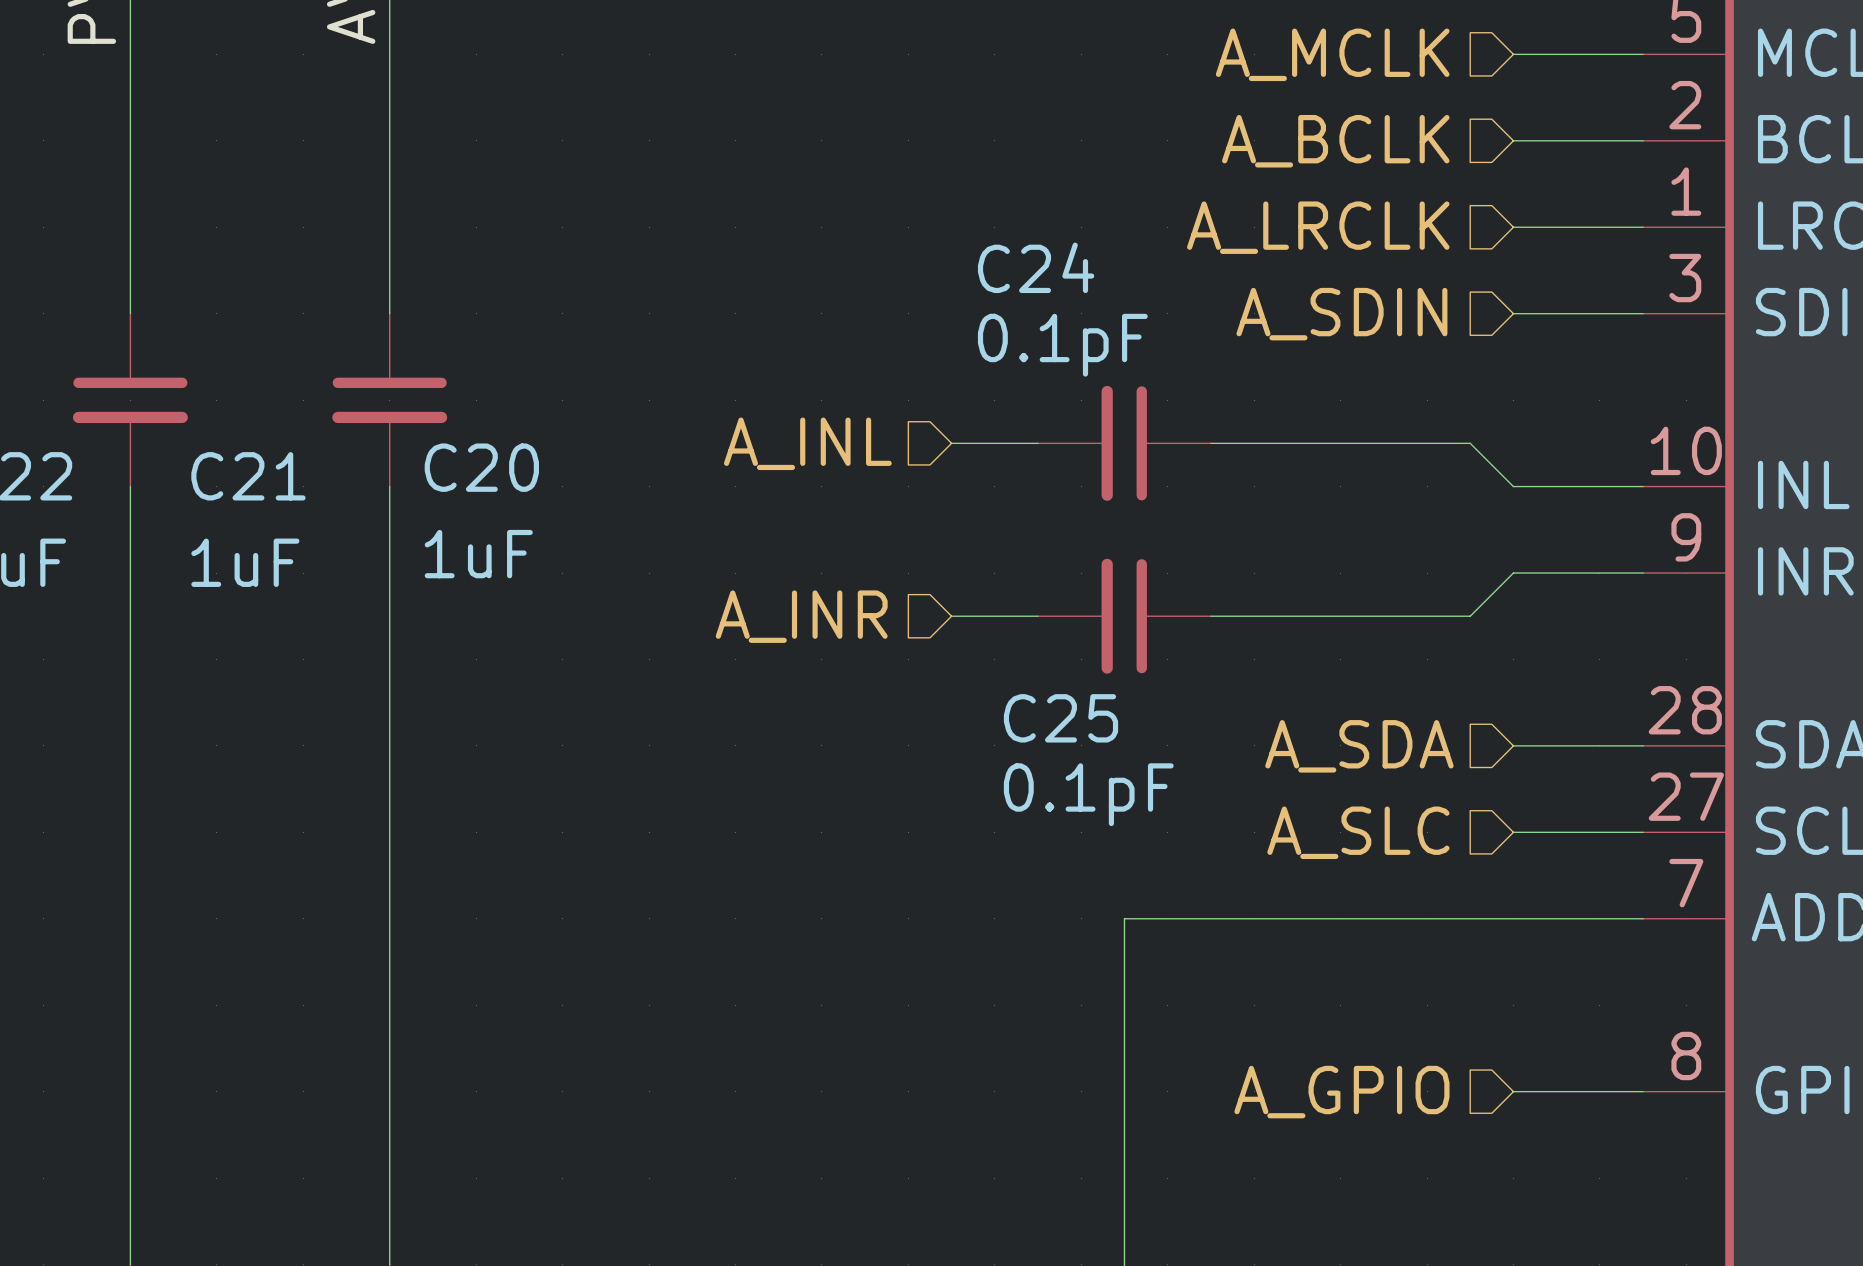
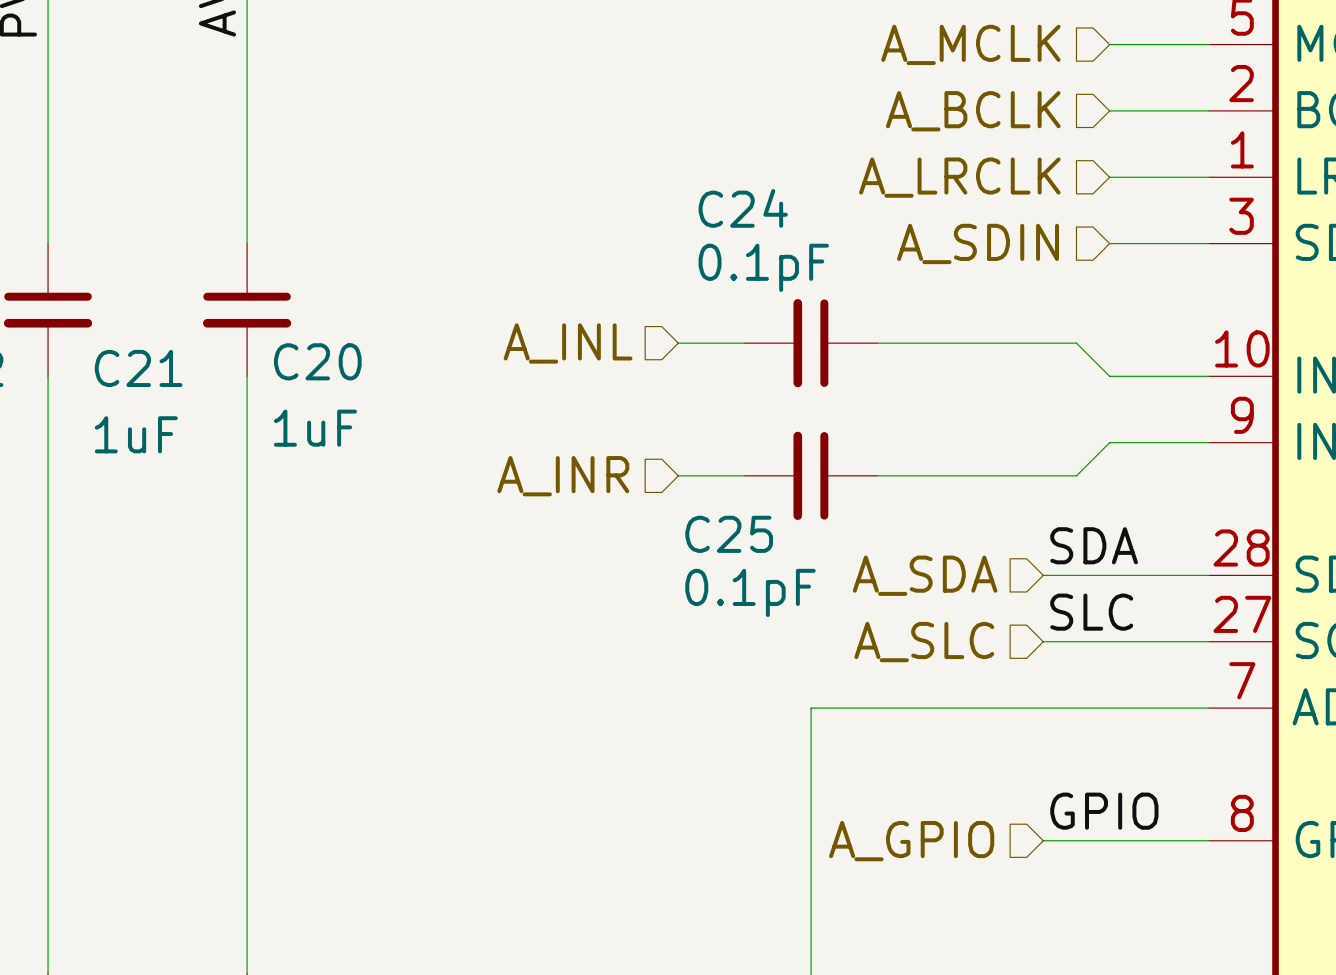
label: none -> SDA (1094, 545)
C25 name position: C25 (1060, 718) -> C25 (729, 534)
wire: none -> (1043, 575) (1109, 575)
hierarchical label position: A_SDA (1359, 746) -> A_SDA (925, 575)
label: none -> SLC (1091, 612)
C25 value position: 0.1pF (1088, 794) -> 0.1pF (750, 592)
hierarchical label position: A_SLC (1358, 832) -> A_SLC (924, 642)
wire: none -> (1043, 641) (1109, 641)
label: none -> GPIO (1104, 811)
wire: none -> (1043, 840) (1109, 840)
hierarchical label position: A_GPIO (1341, 1092) -> A_GPIO (911, 841)

